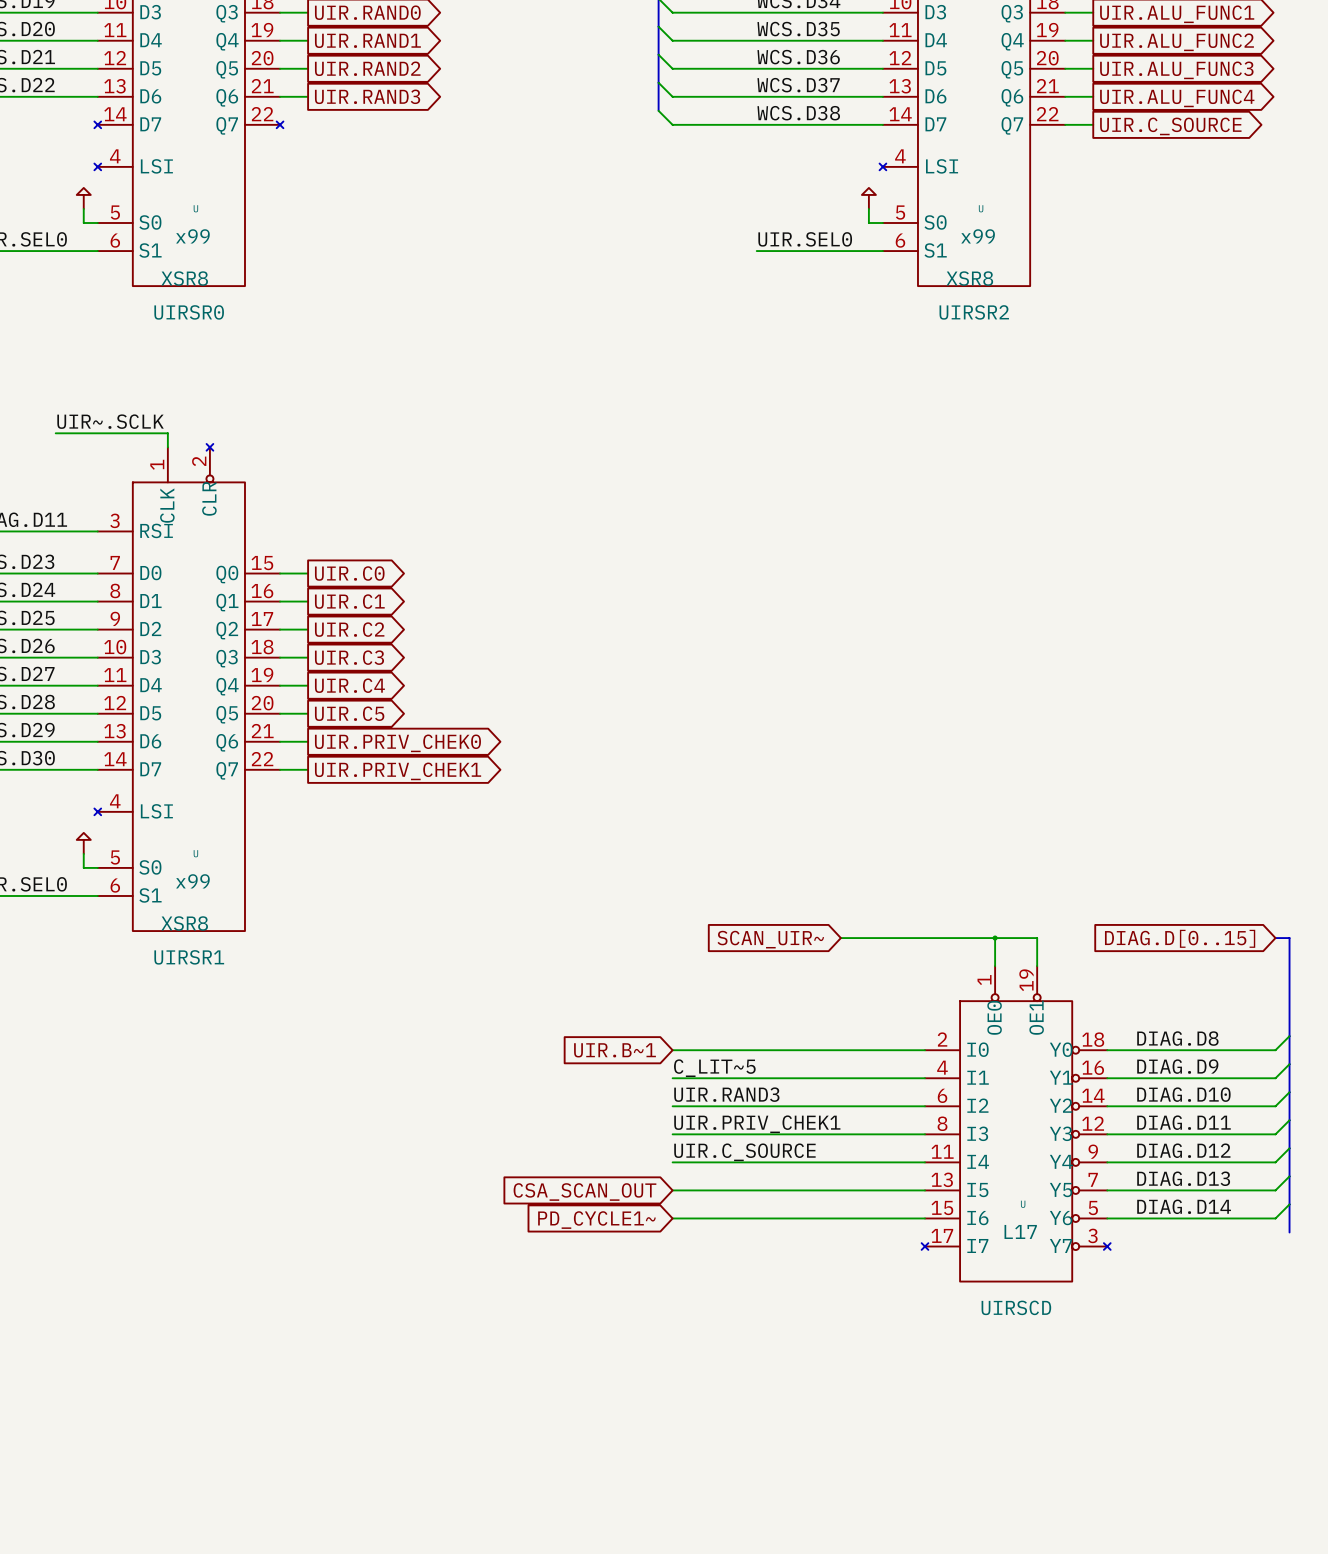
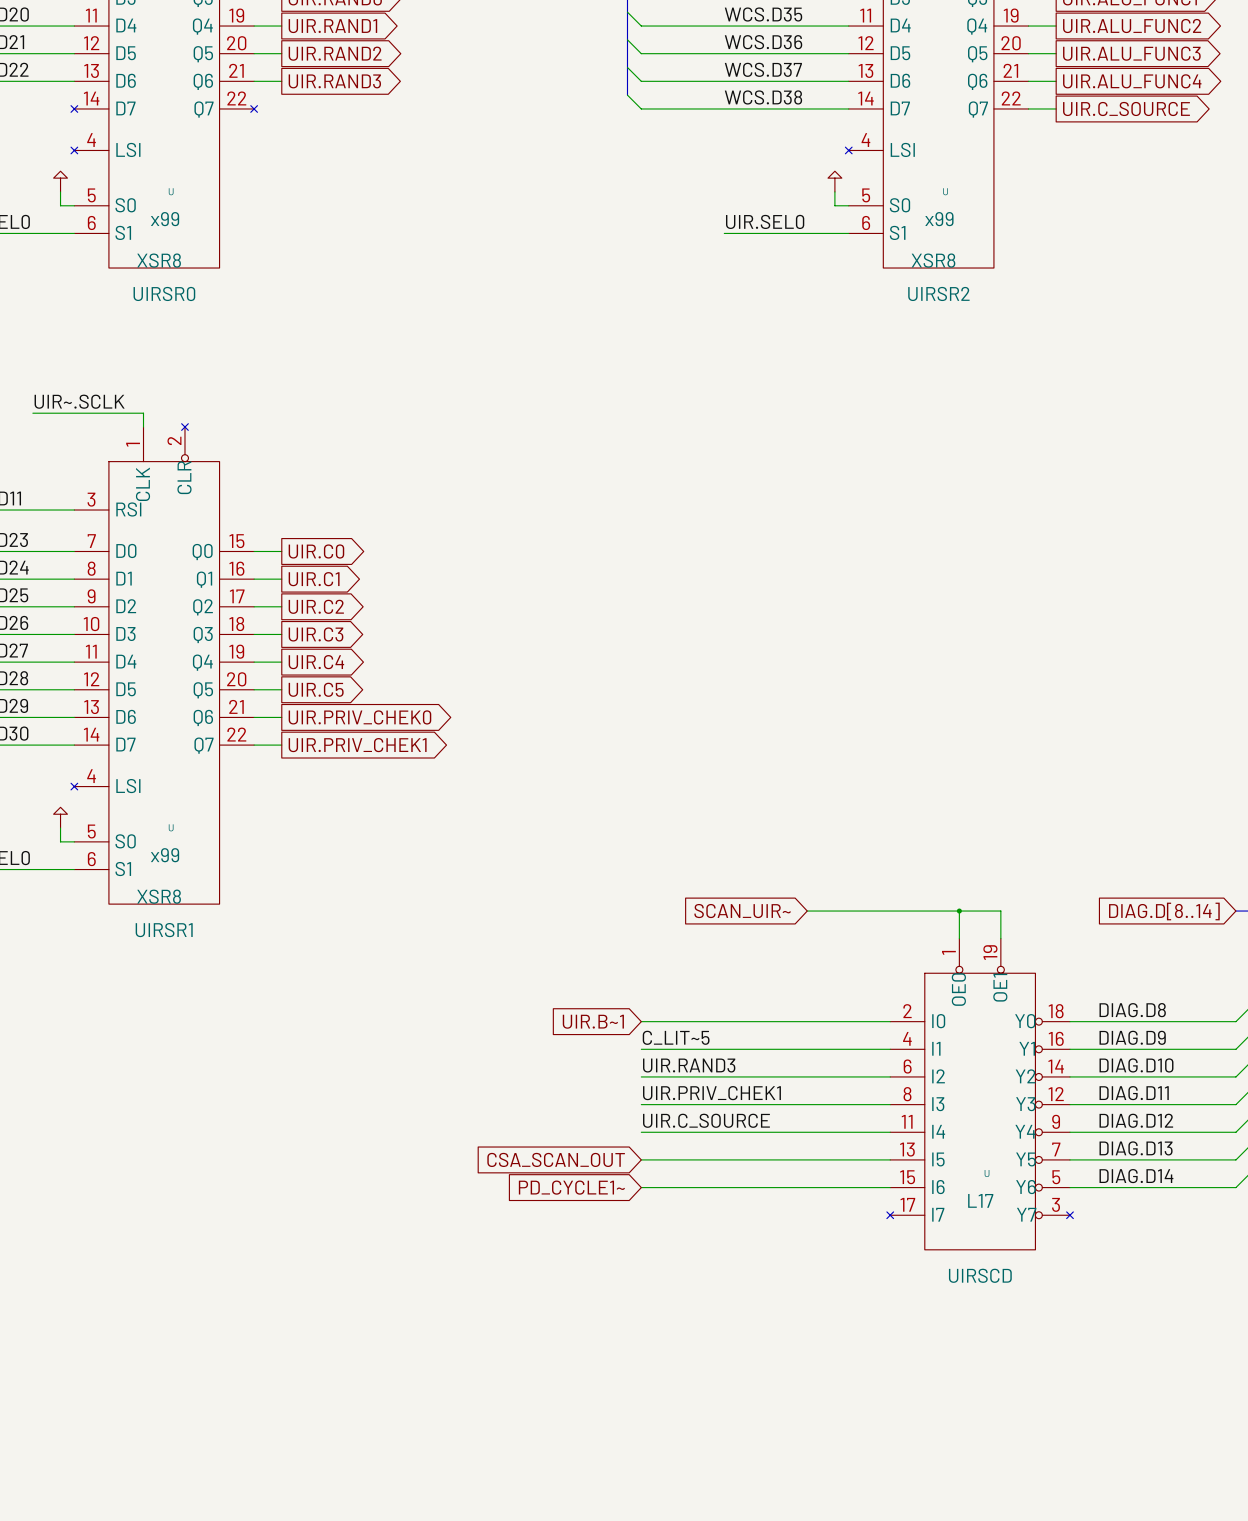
global label: DIAG.D[0..15] (1180, 938) -> DIAG.D[8..14] (1164, 911)

